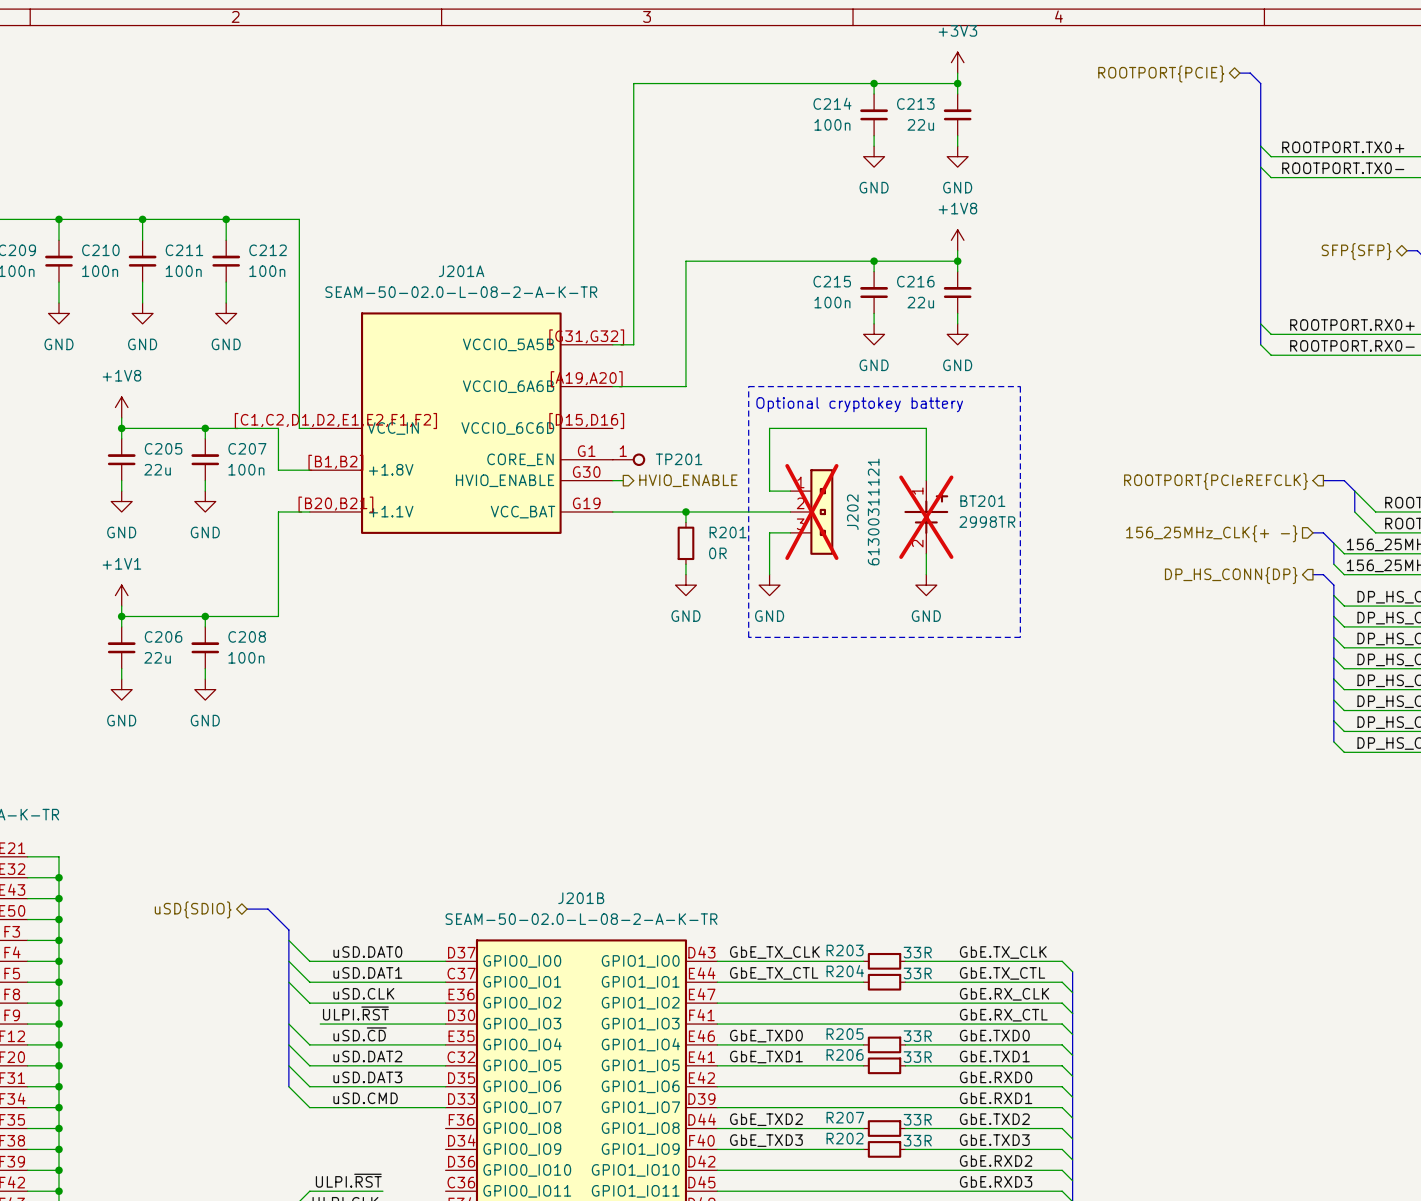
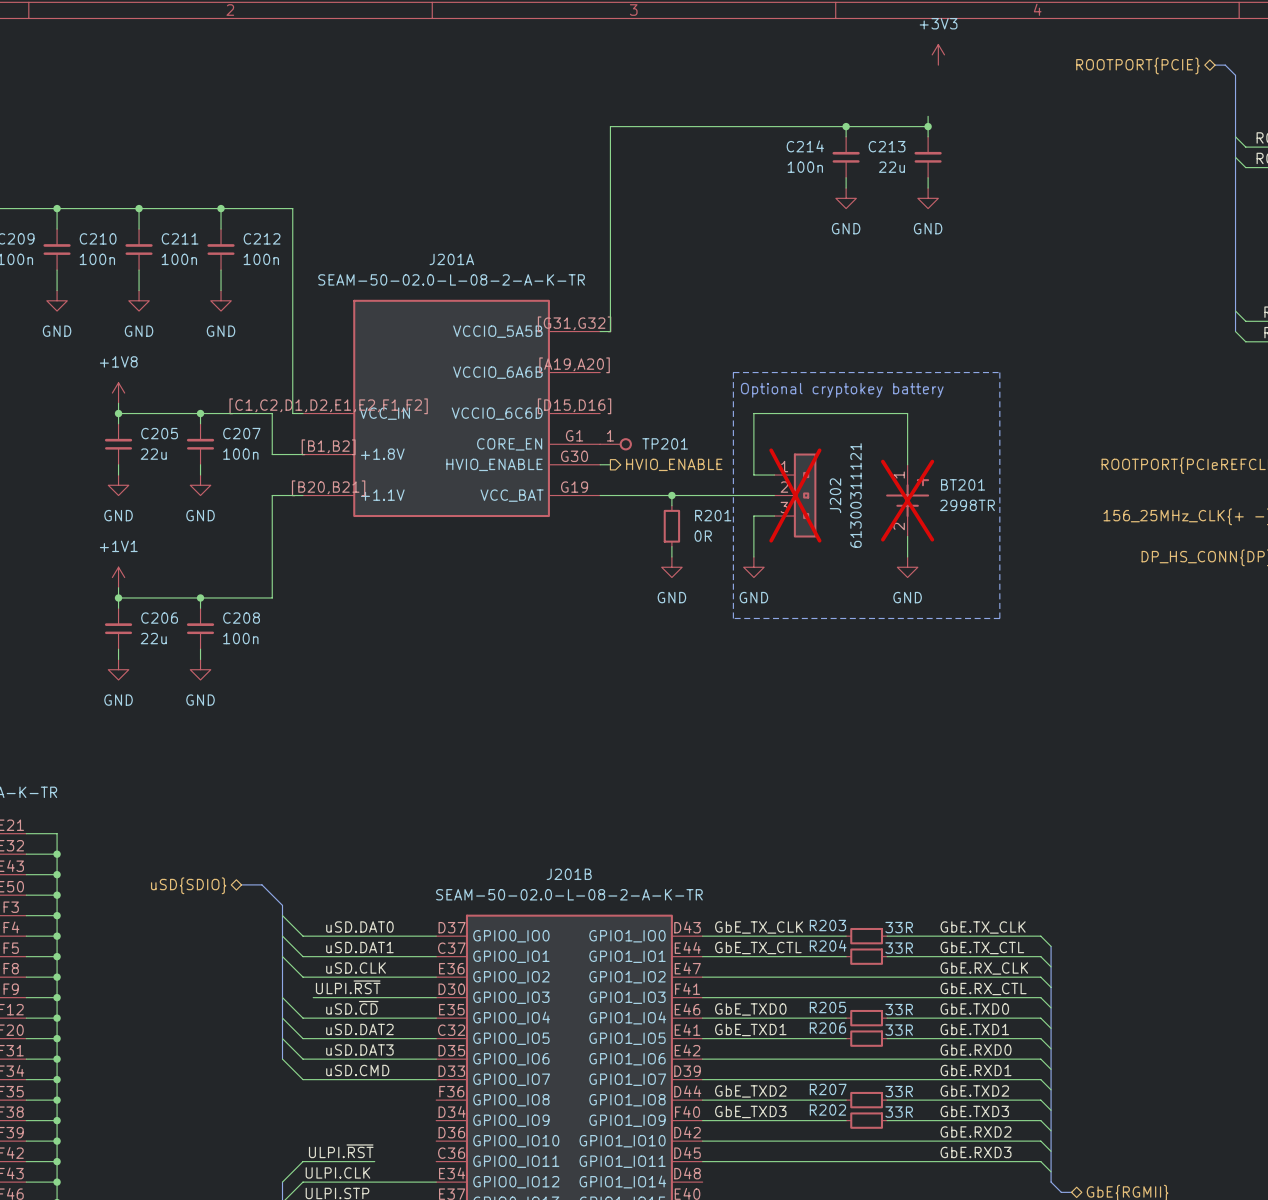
wire: (957, 73) (957, 94) -> (928, 116) (928, 136)
wire: (874, 83) (874, 94) -> (846, 126) (846, 136)
junction: (874, 83) -> none
wire: (957, 83) (633, 83) (633, 344) (623, 344) -> (928, 126) (610, 126) (610, 331)
junction: (957, 83) -> none
C214 position: (874, 114) -> (846, 157)
C213 position: (957, 114) -> (928, 157)
junction: none -> (846, 126)
wire: (874, 135) (874, 146) -> (846, 177) (846, 188)
junction: none -> (928, 126)
wire: (957, 135) (957, 146) -> (928, 177) (928, 188)
power symbol: GND (874, 156) -> none
power symbol: GND (957, 156) -> none
power symbol: none -> GND (846, 198)
power symbol: none -> GND (928, 198)
power symbol: +1V8 (957, 240) -> none
wire: (957, 250) (957, 271) -> none
wire: (874, 261) (874, 271) -> none
junction: (874, 261) -> none
wire: (957, 261) (685, 261) (685, 386) (612, 386) -> none
junction: (957, 261) -> none
C215: (874, 292) -> none
C216: (957, 292) -> none
wire: (874, 313) (874, 323) -> none
wire: (957, 313) (957, 323) -> none
power symbol: GND (874, 334) -> none
power symbol: GND (957, 334) -> none

